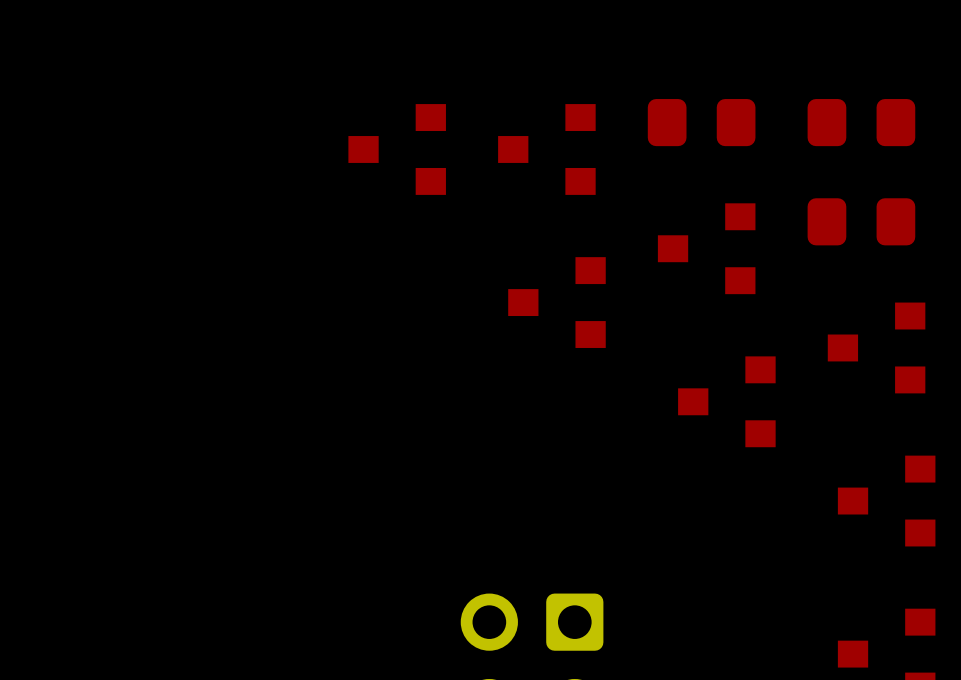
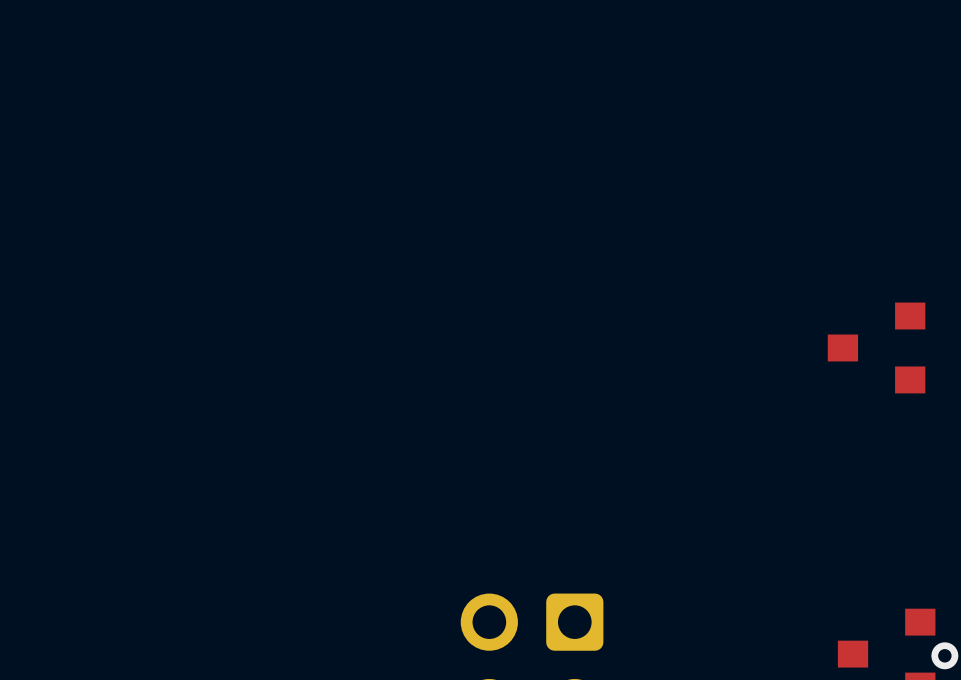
part: (701, 122) -> none
part: (861, 122) -> none
part: (397, 149) -> none
part: (546, 149) -> none
part: (861, 221) -> none
part: (706, 248) -> none
part: (556, 302) -> none
part: (726, 401) -> none
part: (886, 501) -> none
via: none -> (944, 655)

